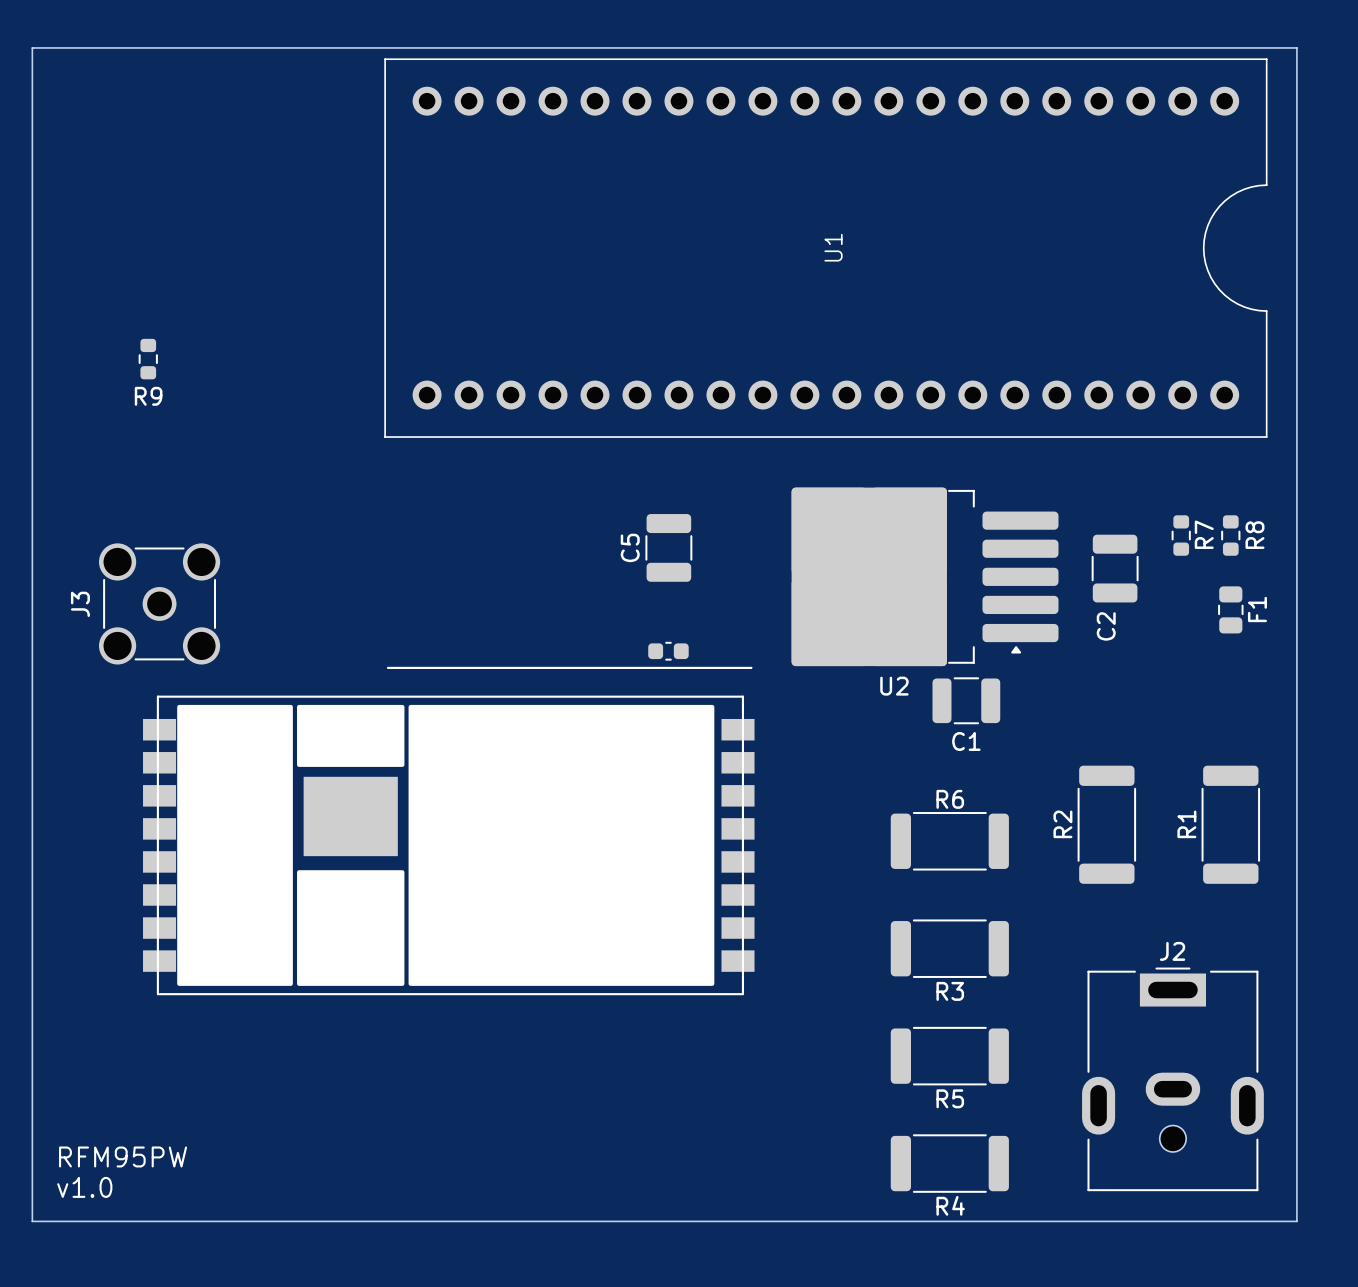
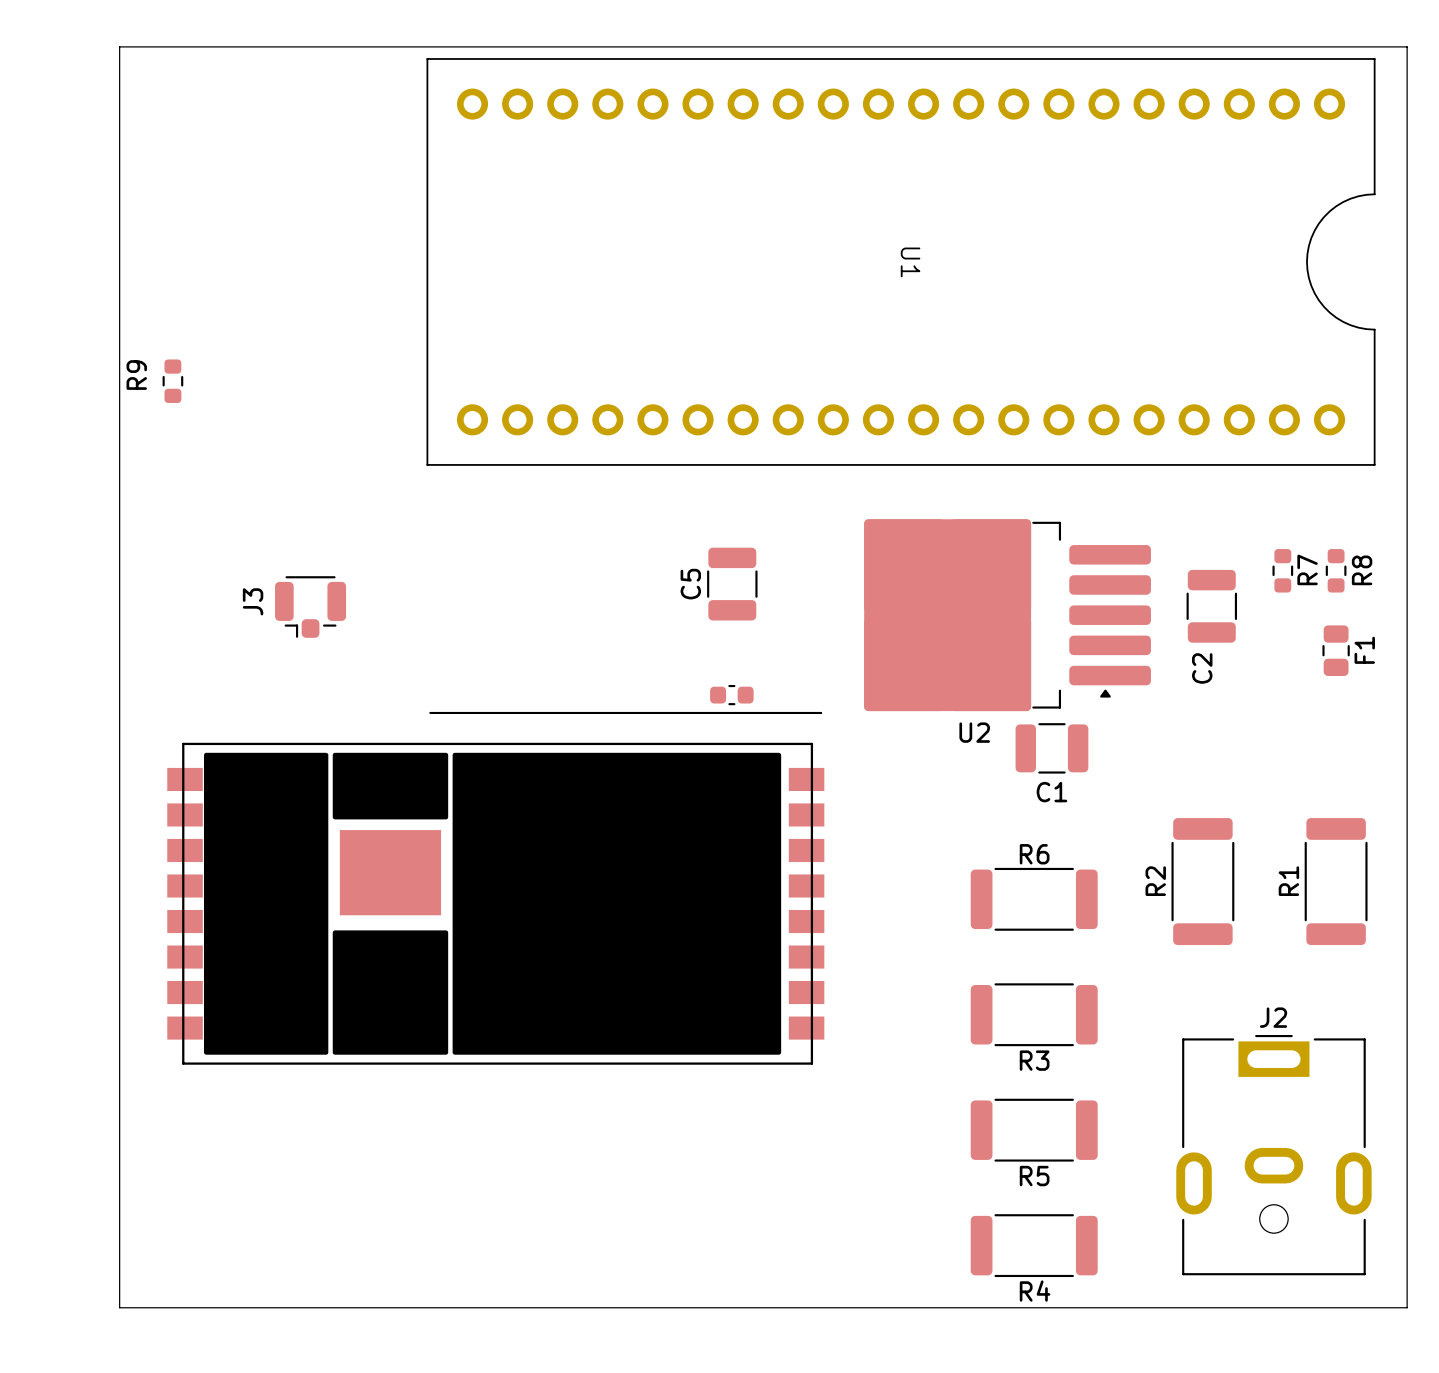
board edge: (98, 47) (32, 47) (32, 1221) (98, 1221) -> (119, 46) (119, 1307)
U1 name rotation: 0° (833, 247) -> 180° (910, 262)
R9 name rotation: 0° (148, 396) -> 90° counterclockwise (136, 375)
R9 name position: R9 (148, 396) -> R9 (136, 375)
J3 footprint: [98, 543, 221, 665] -> [275, 576, 347, 638]
text: RFM95PW (123, 1156) -> none
text: v1.0 (84, 1187) -> none

